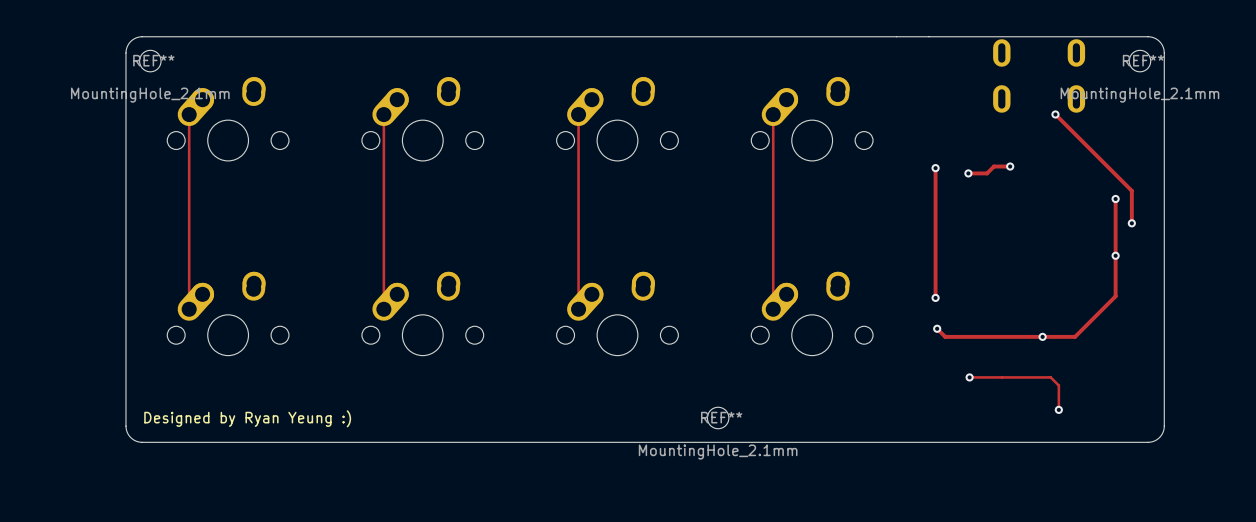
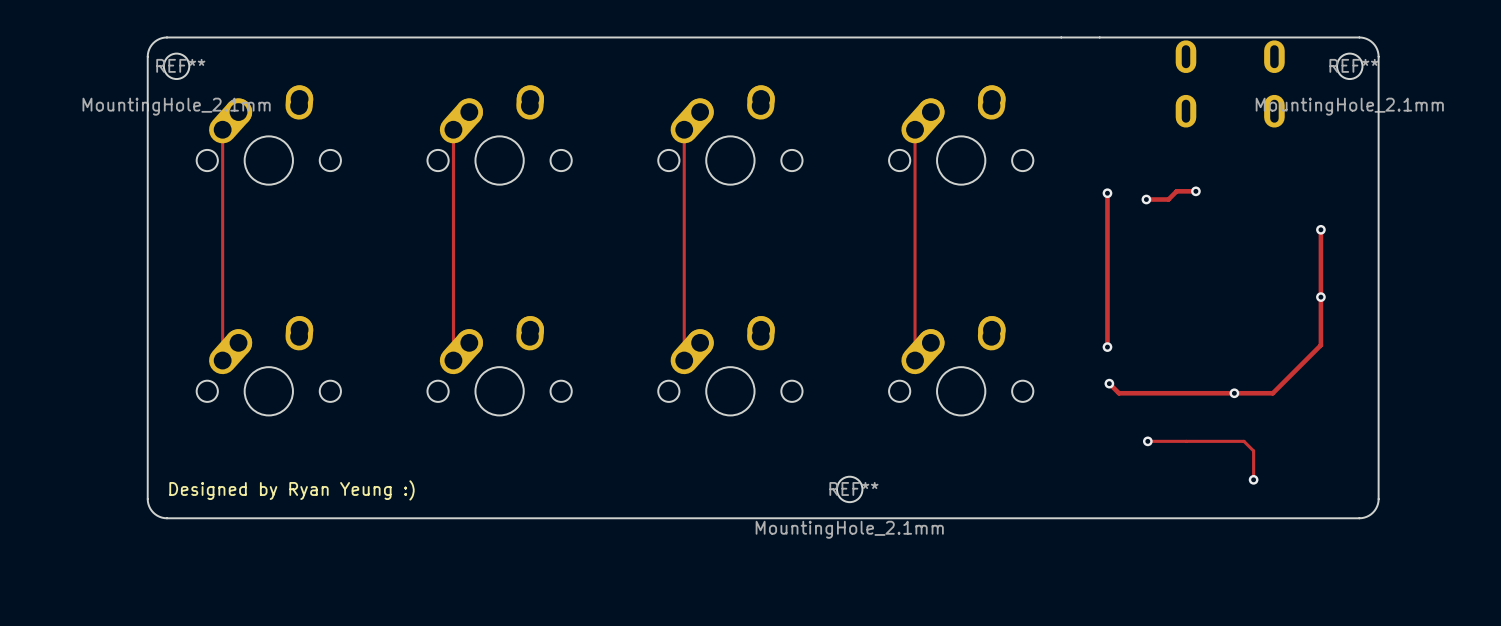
track: (1055, 114) (1131, 190) (1131, 223) -> none
via: (1055, 114) -> none
via: (1131, 223) -> none

